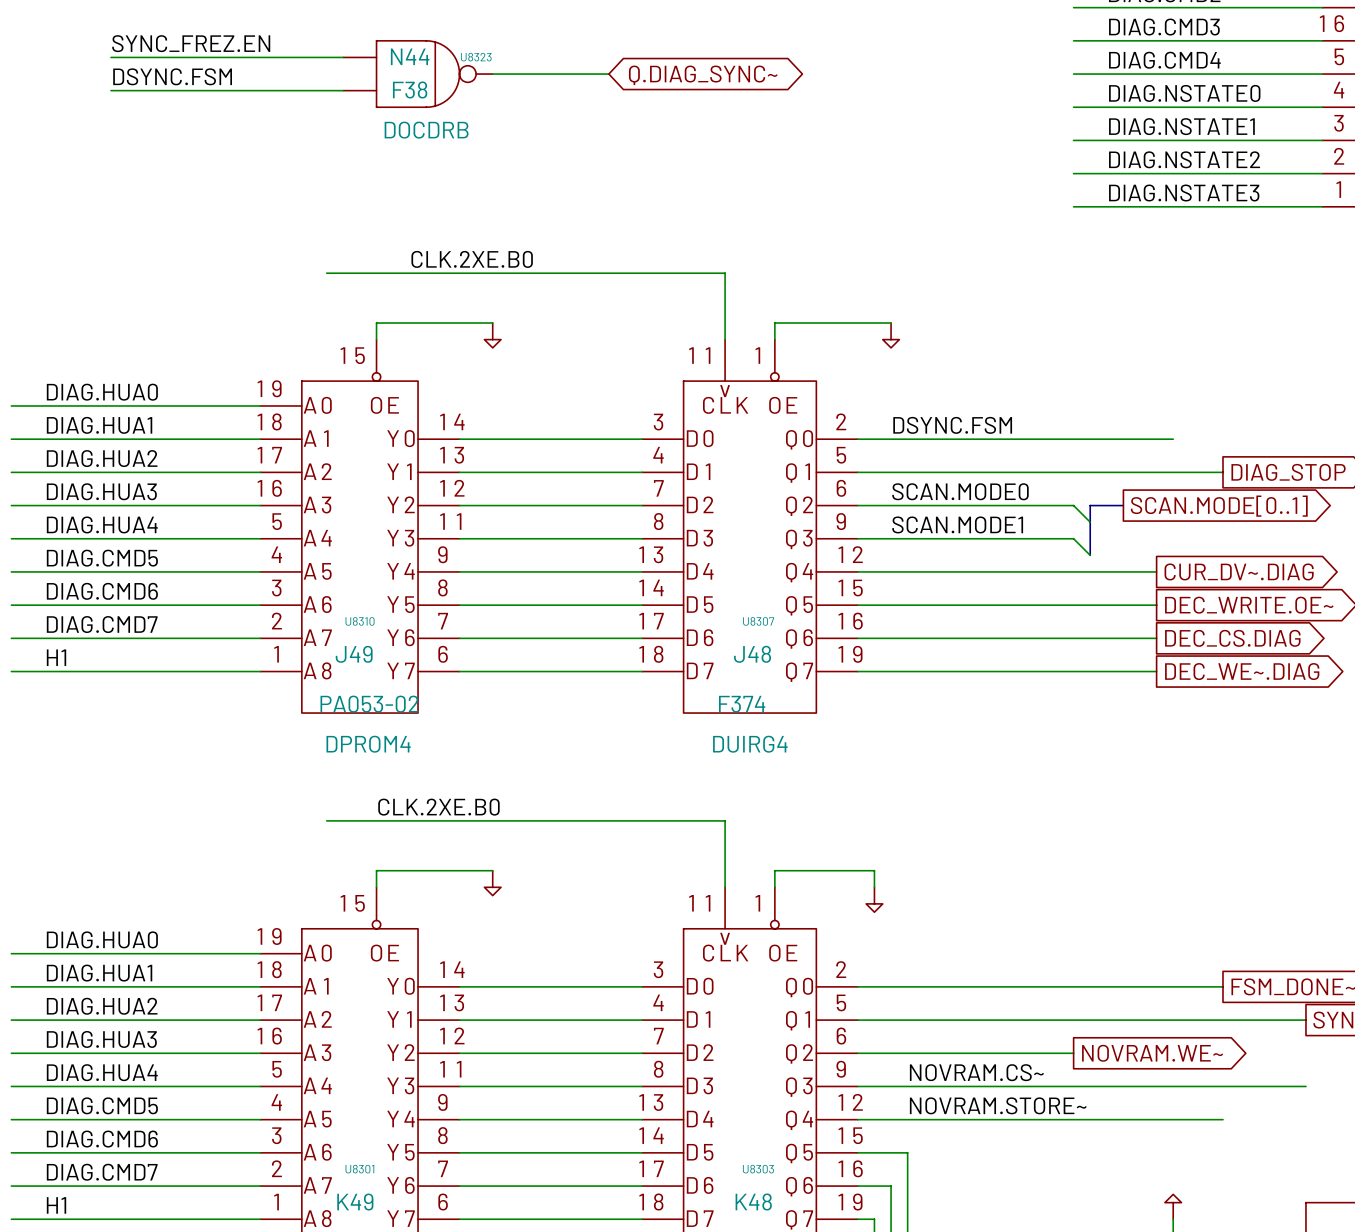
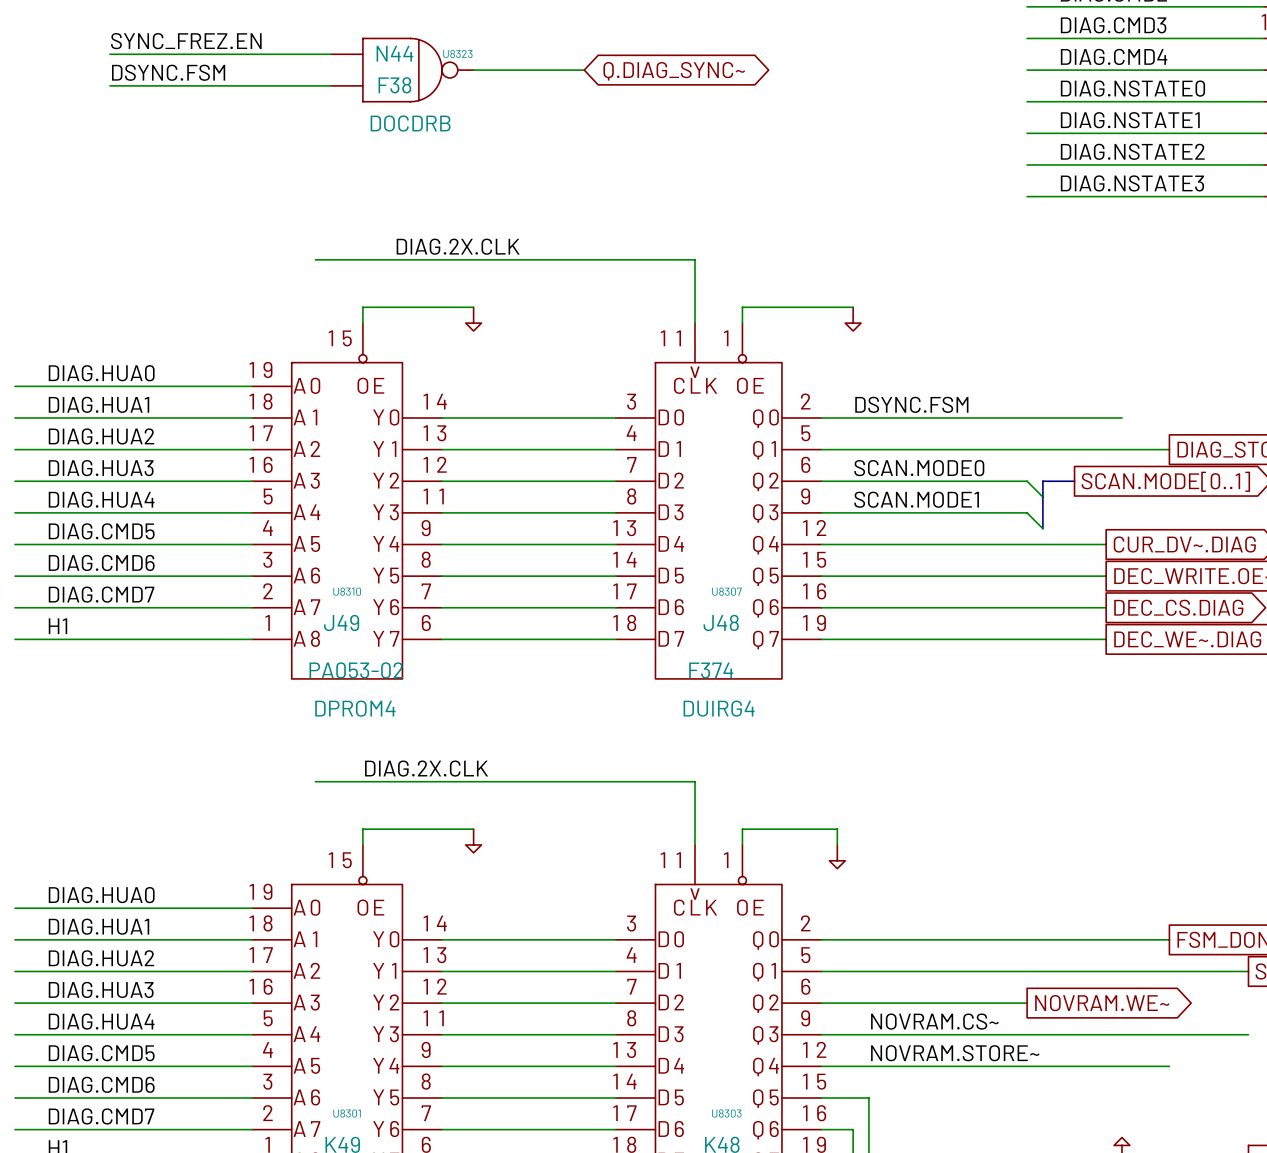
label: CLK.2XE.B0 (472, 259) -> DIAG.2X.CLK (458, 246)
label: CLK.2XE.B0 (438, 807) -> DIAG.2X.CLK (426, 768)

